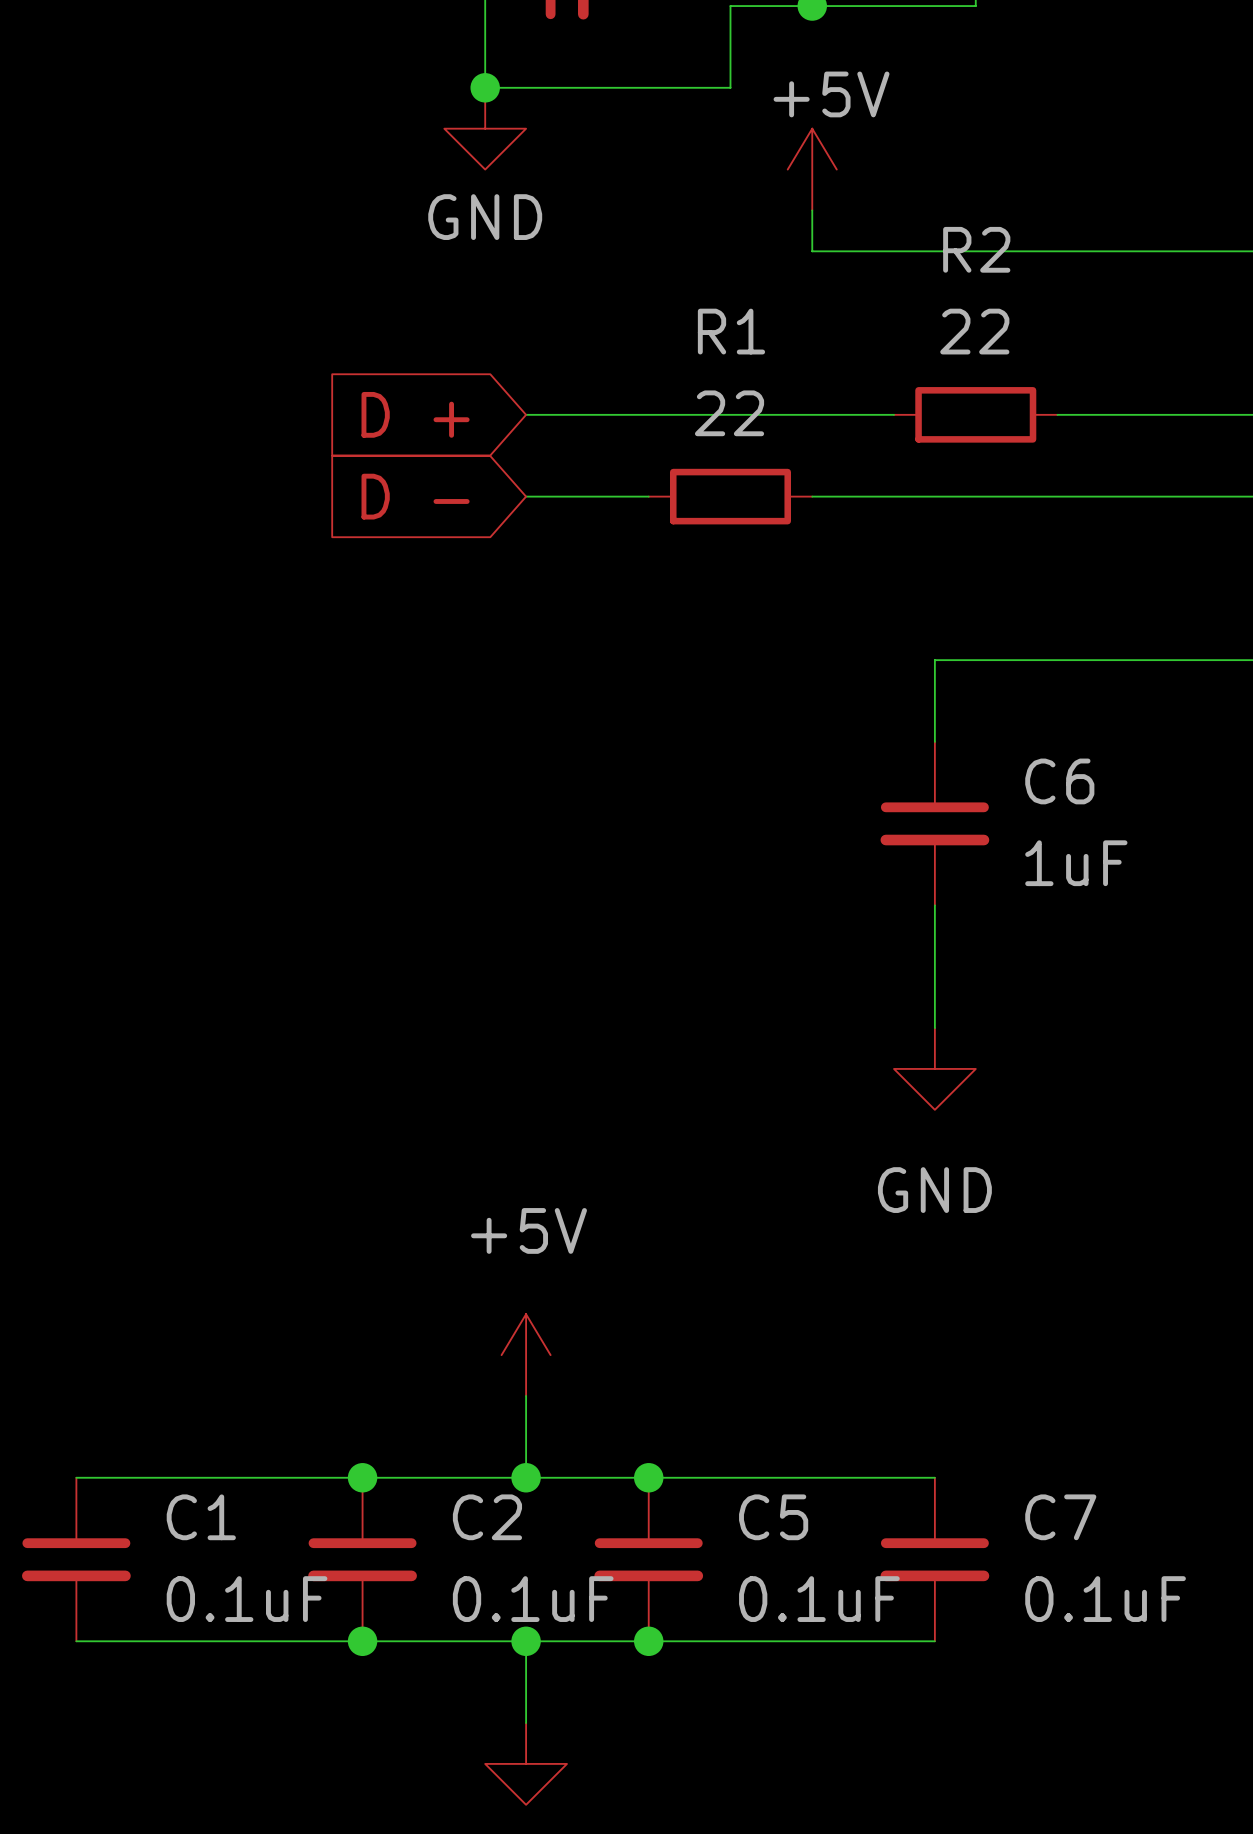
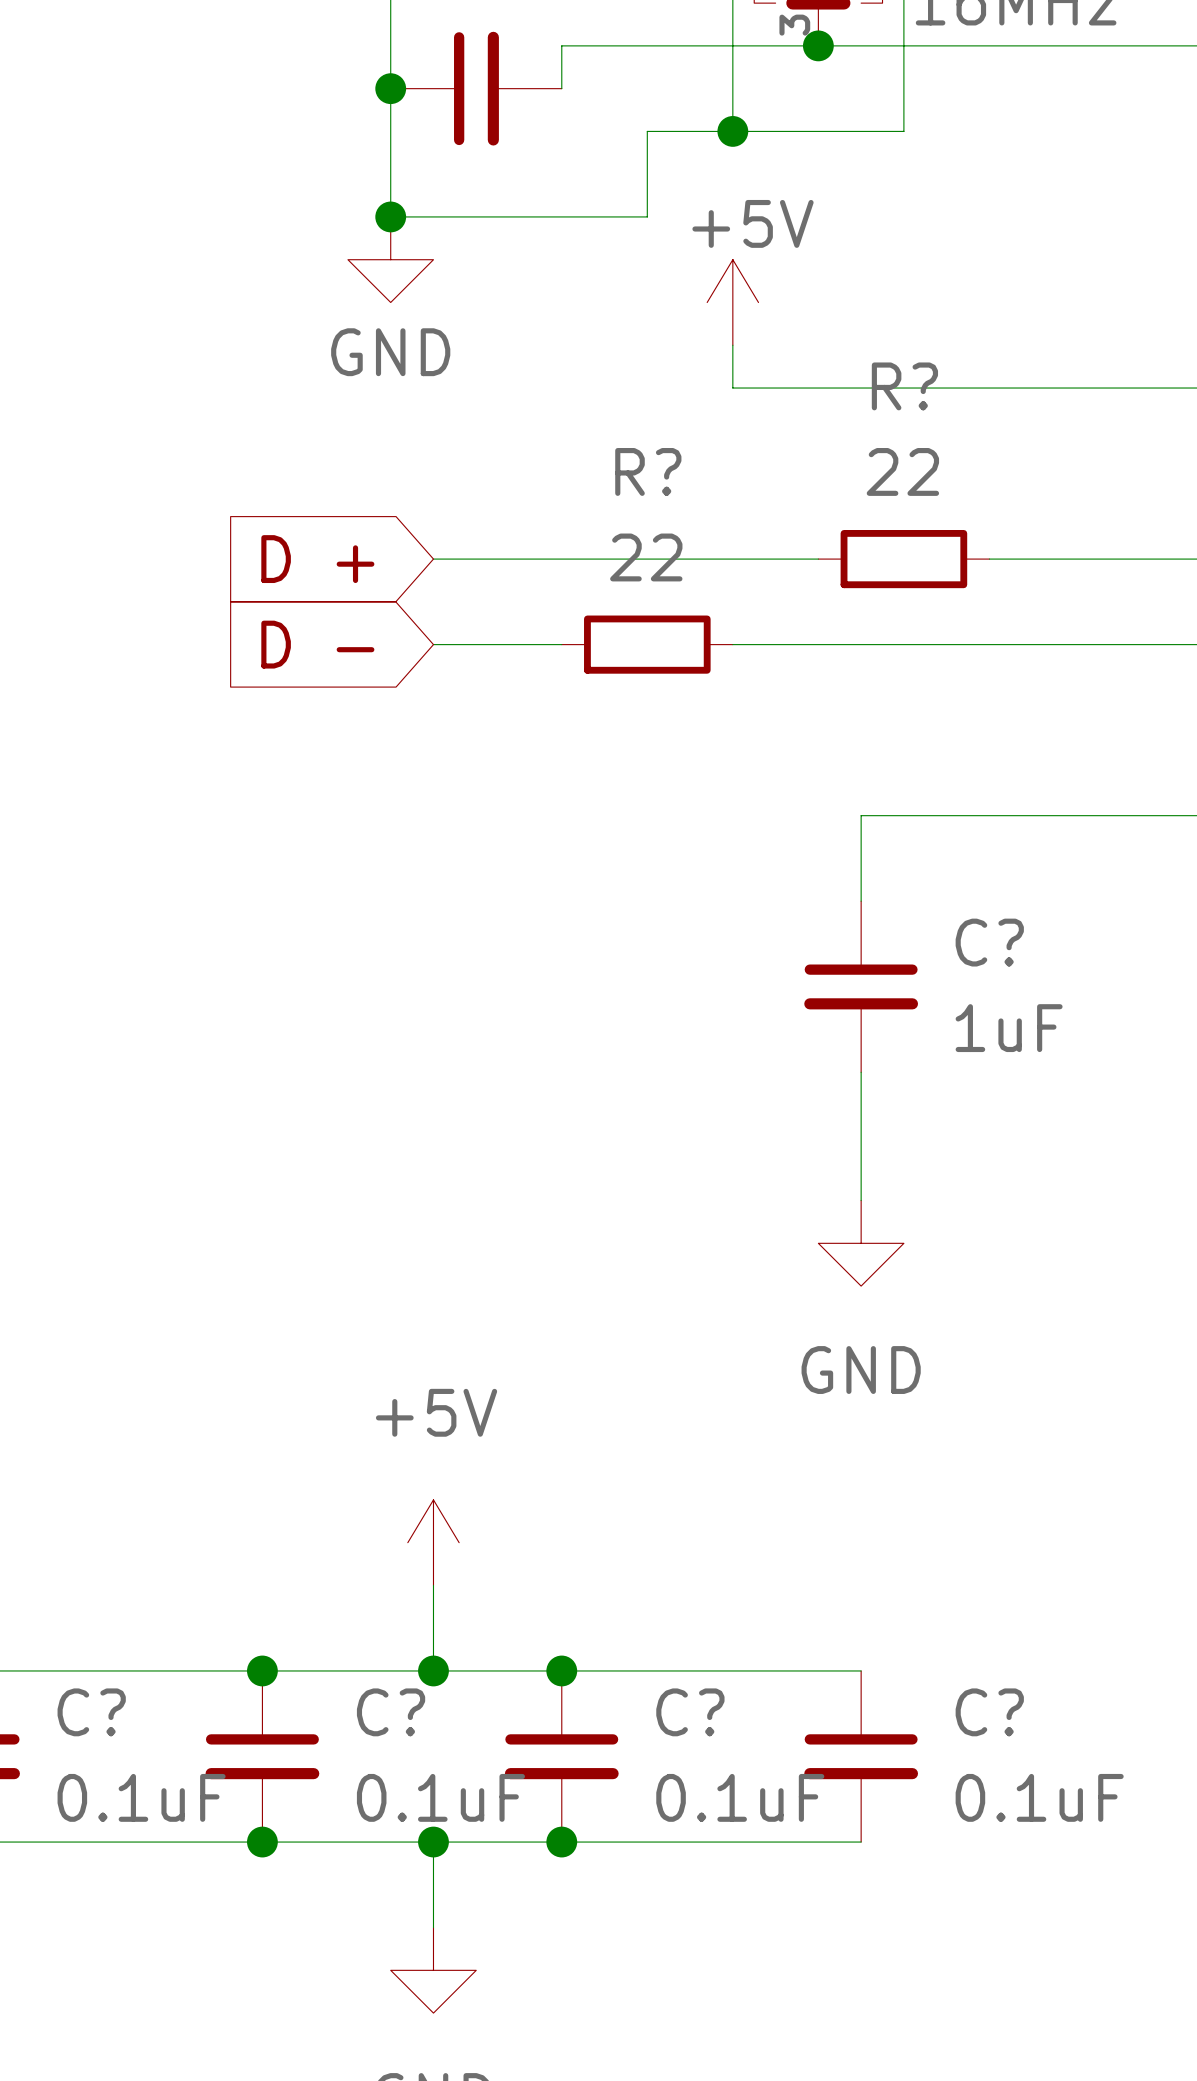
R2 name: R2 (976, 249) -> R? (904, 386)
R1 name: R1 (731, 331) -> R? (648, 471)
C6 name: C6 (1059, 781) -> C? (989, 942)
C1 name: C1 (201, 1517) -> C? (91, 1712)
C2 name: C2 (487, 1517) -> C? (391, 1712)
C5 name: C5 (773, 1517) -> C? (690, 1712)
C7 name: C7 (1060, 1517) -> C? (989, 1712)

